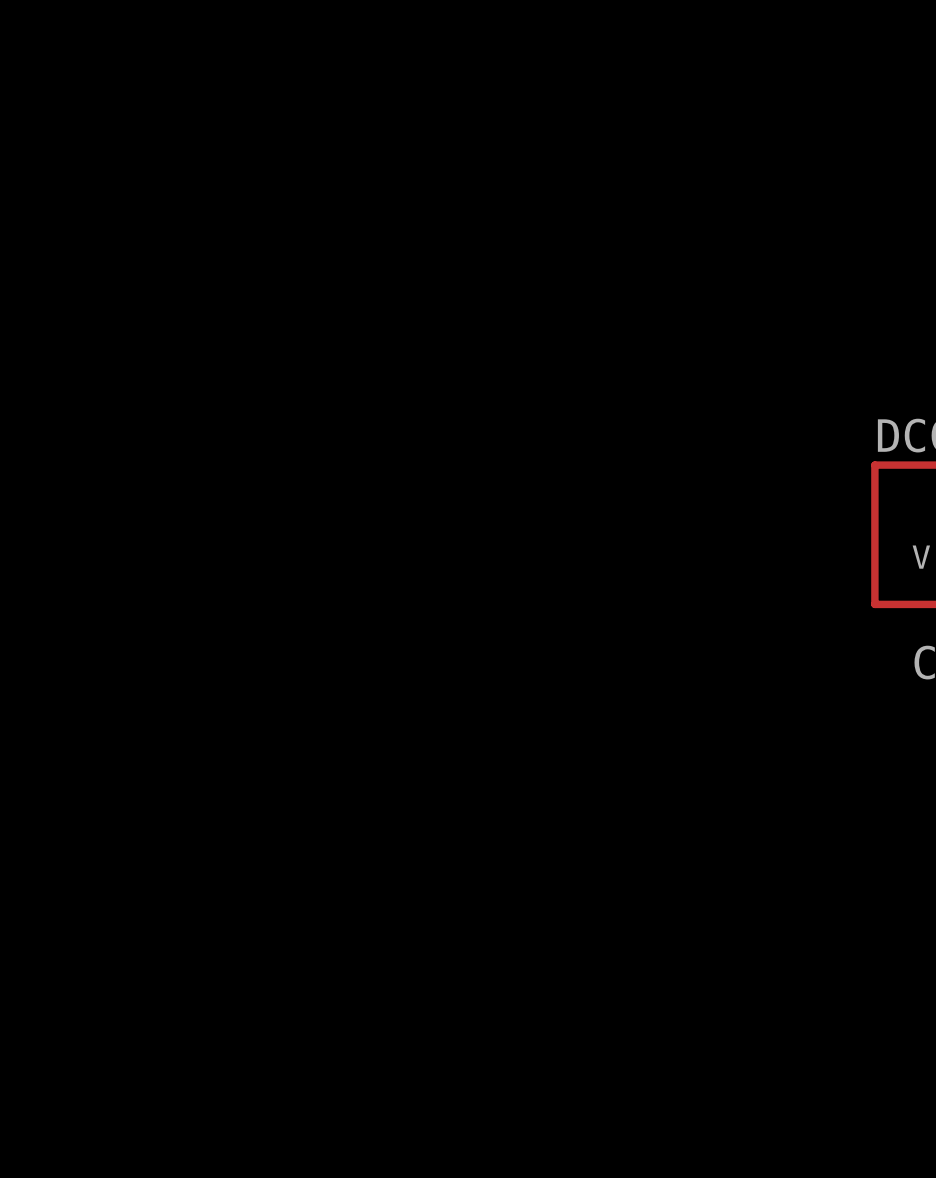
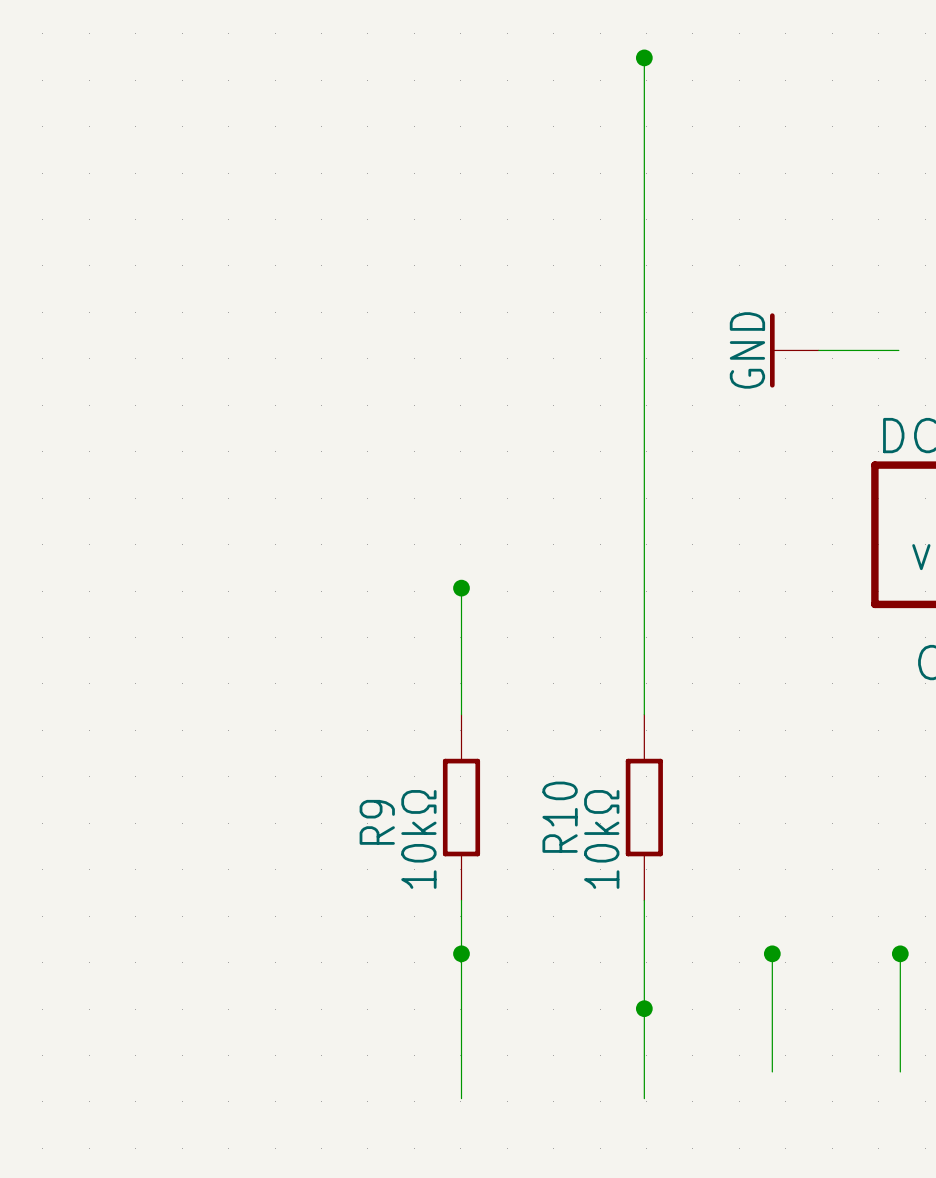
wire: none -> (644, 57) (644, 714)
junction: none -> (644, 57)
power symbol: none -> GND (794, 350)
wire: none -> (818, 350) (898, 350)
wire: none -> (461, 588) (461, 714)
junction: none -> (461, 588)
R9: none -> 10kΩ (461, 807)
R10: none -> 10kΩ (644, 807)
wire: none -> (461, 900) (461, 1098)
wire: none -> (644, 900) (644, 1098)
junction: none -> (461, 953)
wire: none -> (772, 953) (772, 1071)
junction: none -> (772, 953)
wire: none -> (900, 953) (900, 1071)
junction: none -> (900, 953)
junction: none -> (644, 1008)

